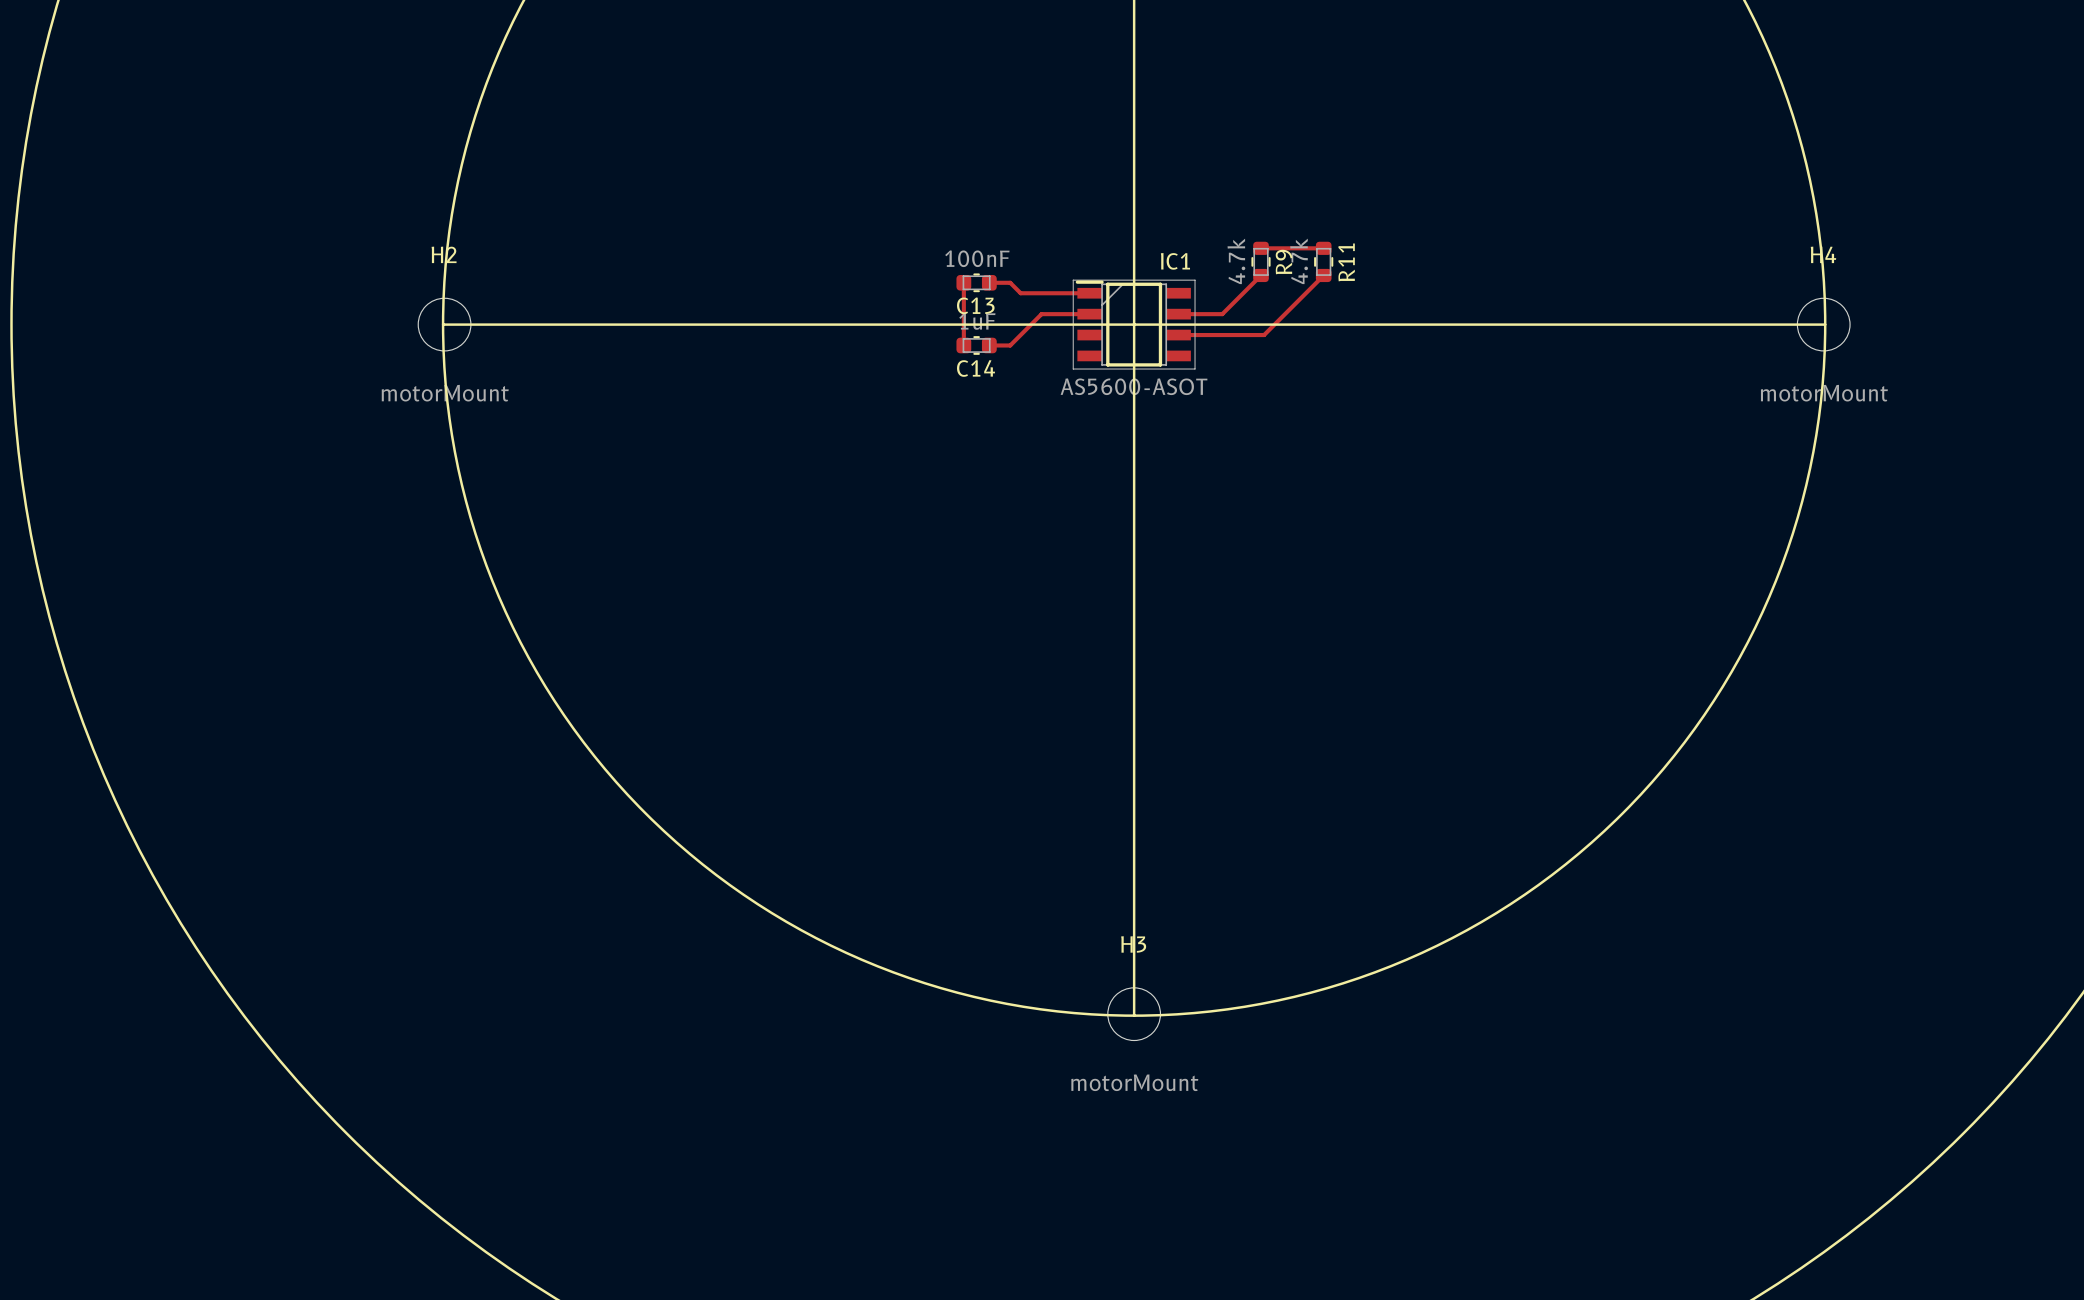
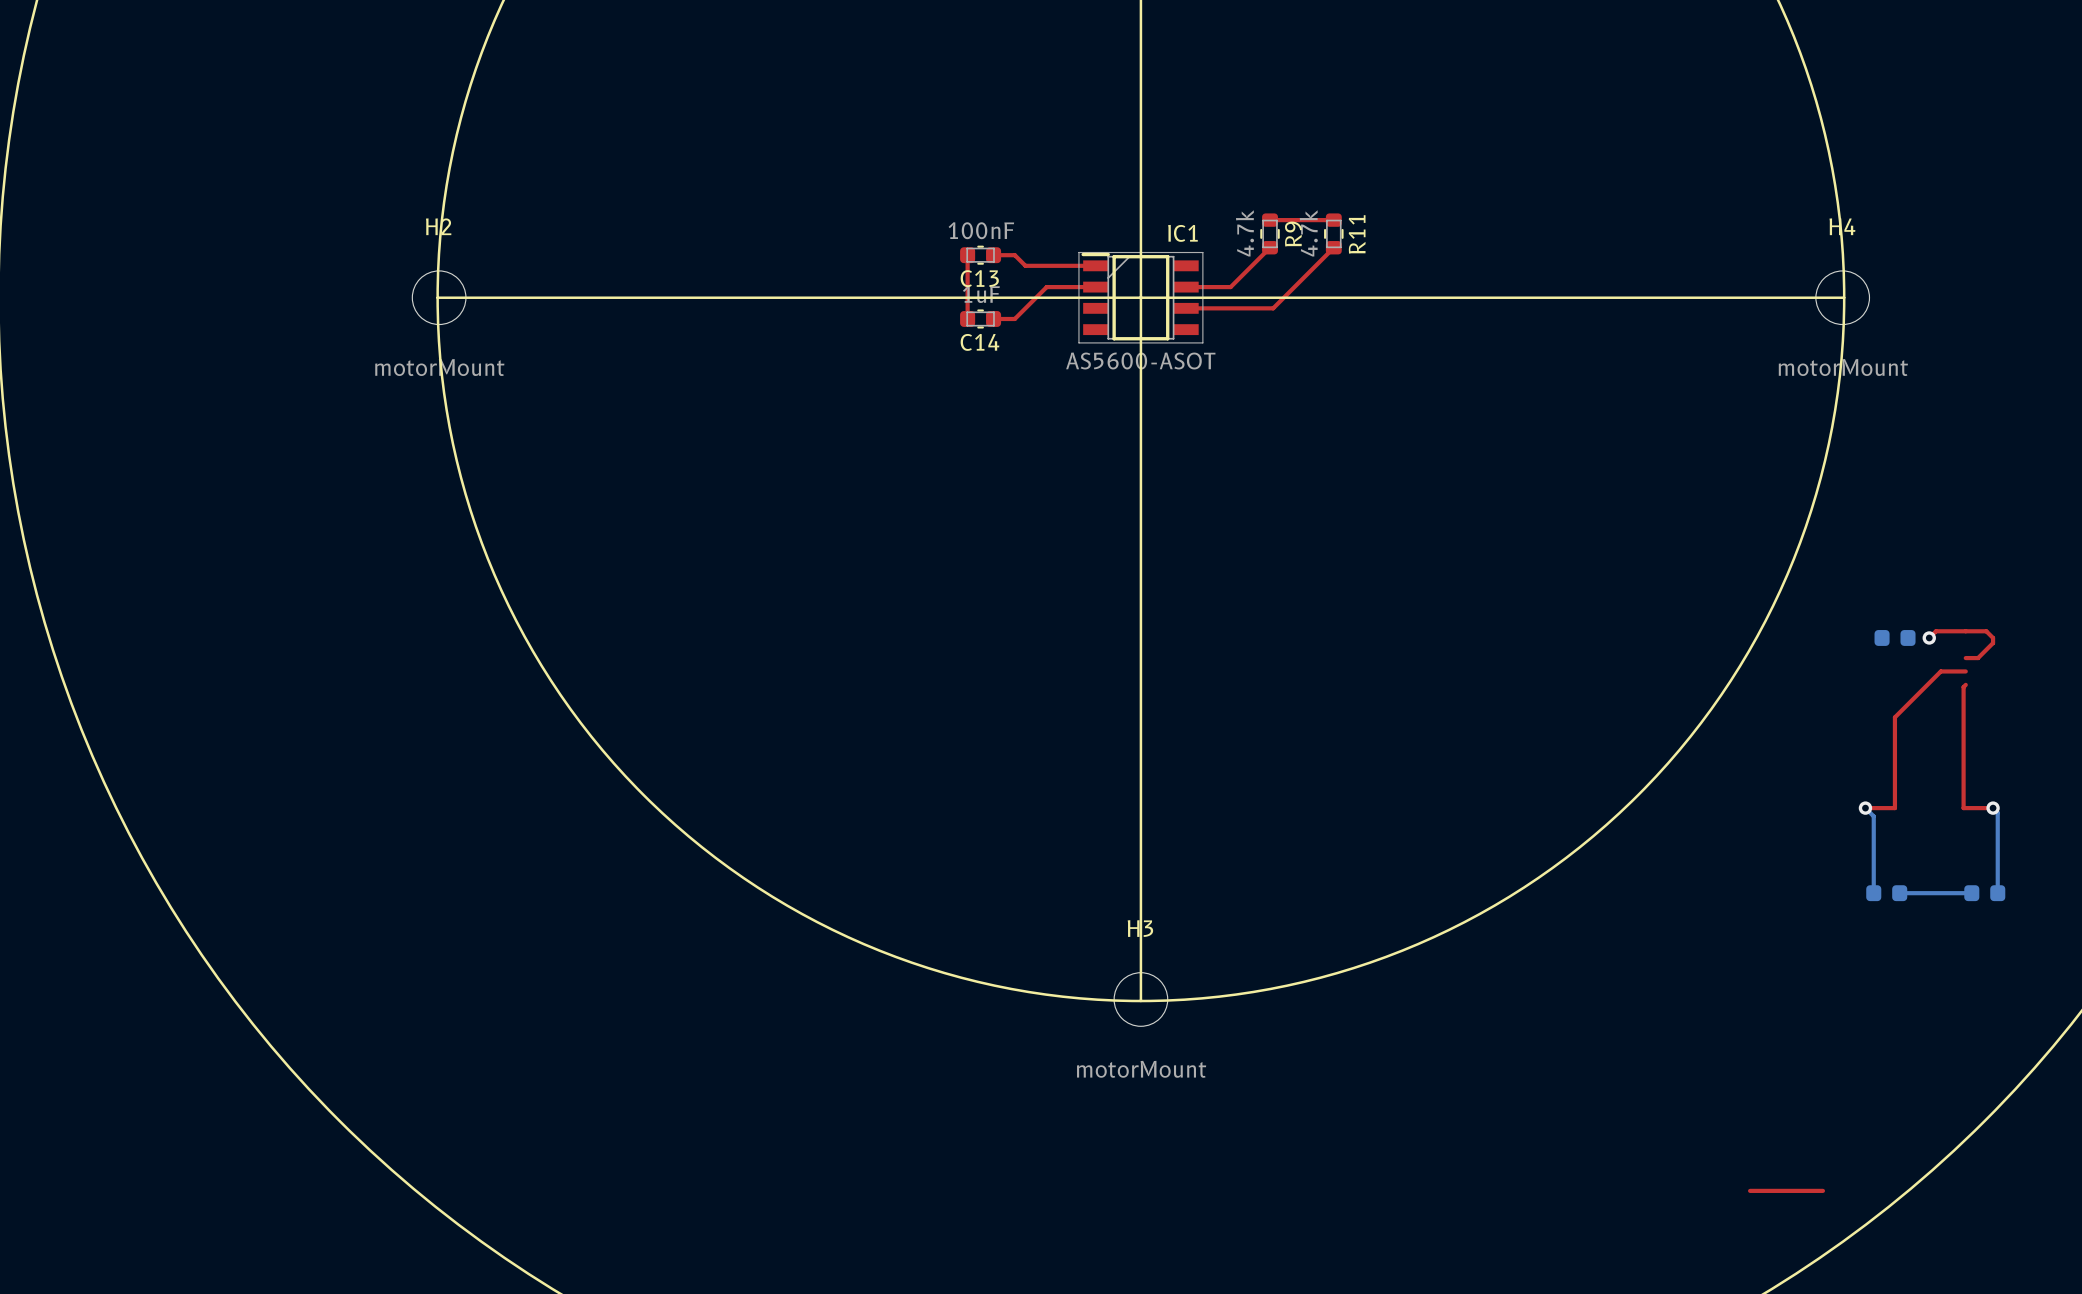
part: none -> (1895, 637)
top track: none -> (1929, 637) (1935, 631) (1986, 631) (1993, 637) (1993, 643) (1978, 658) (1965, 658)
via: none -> (1929, 637)
top track: none -> (1965, 671) (1940, 671) (1894, 717) (1894, 808) (1865, 808)
top track: none -> (1965, 684) (1963, 687) (1963, 808) (1993, 808)
bottom track: none -> (1865, 808) (1873, 816) (1873, 893)
via: none -> (1865, 808)
bottom track: none -> (1993, 808) (1997, 812) (1997, 893)
via: none -> (1993, 808)
part: none -> (1886, 893)
bottom track: none -> (1899, 893) (1971, 893)
part: none -> (1984, 893)
top track: none -> (1750, 1190) (1822, 1190)

